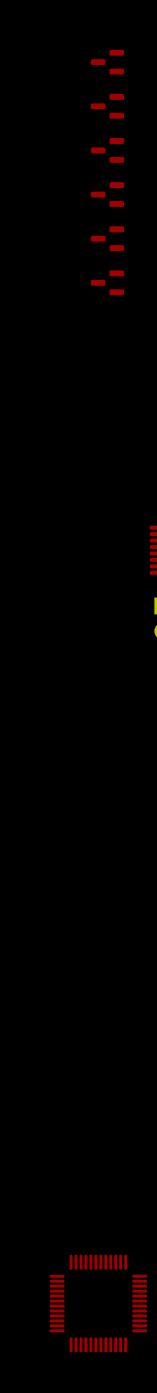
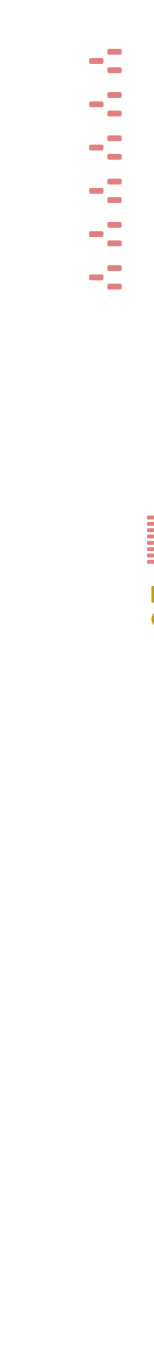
part: (98, 1303) -> none

